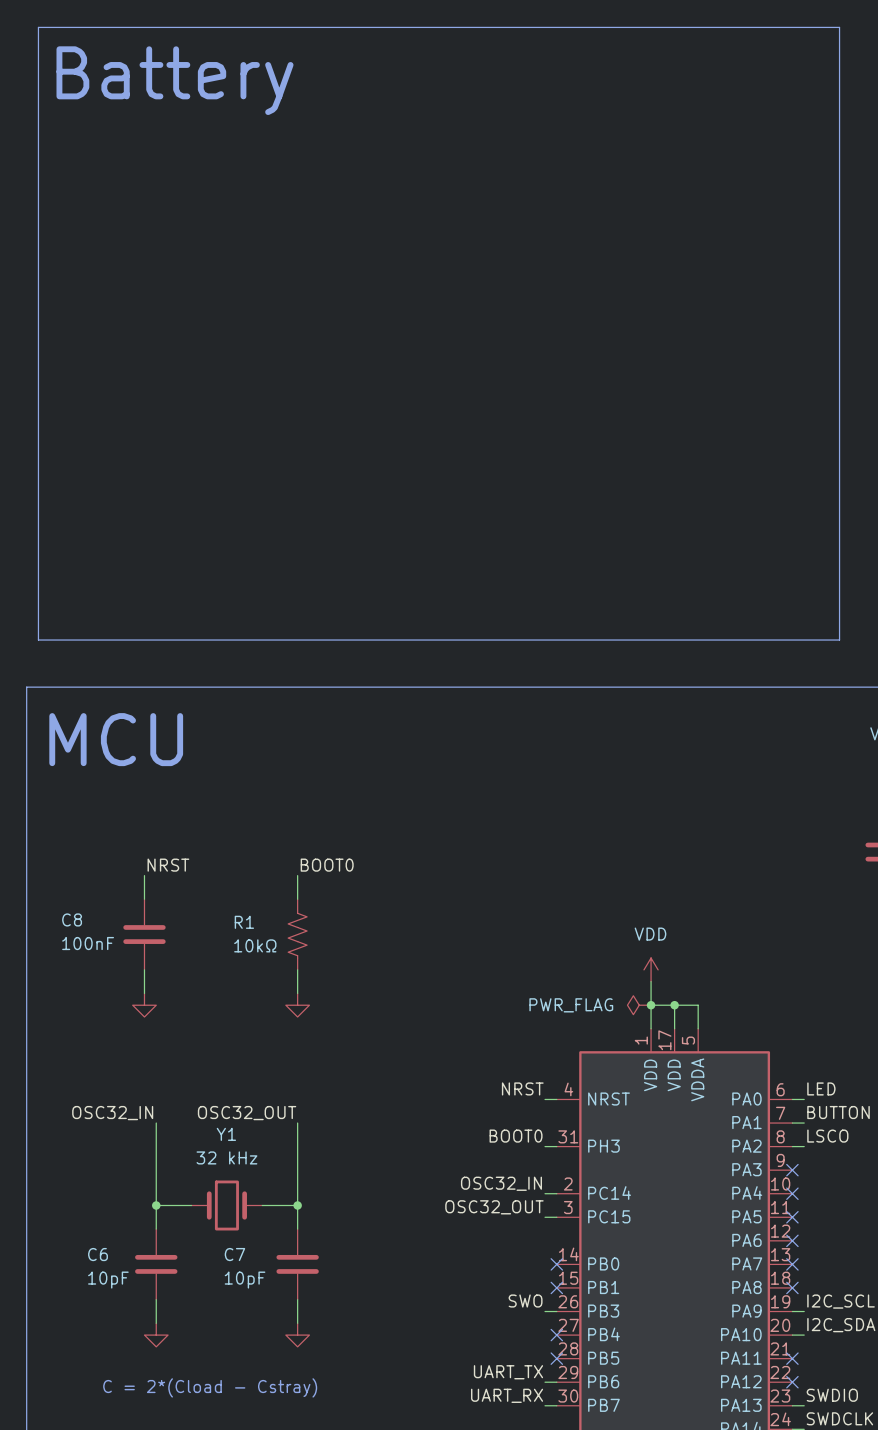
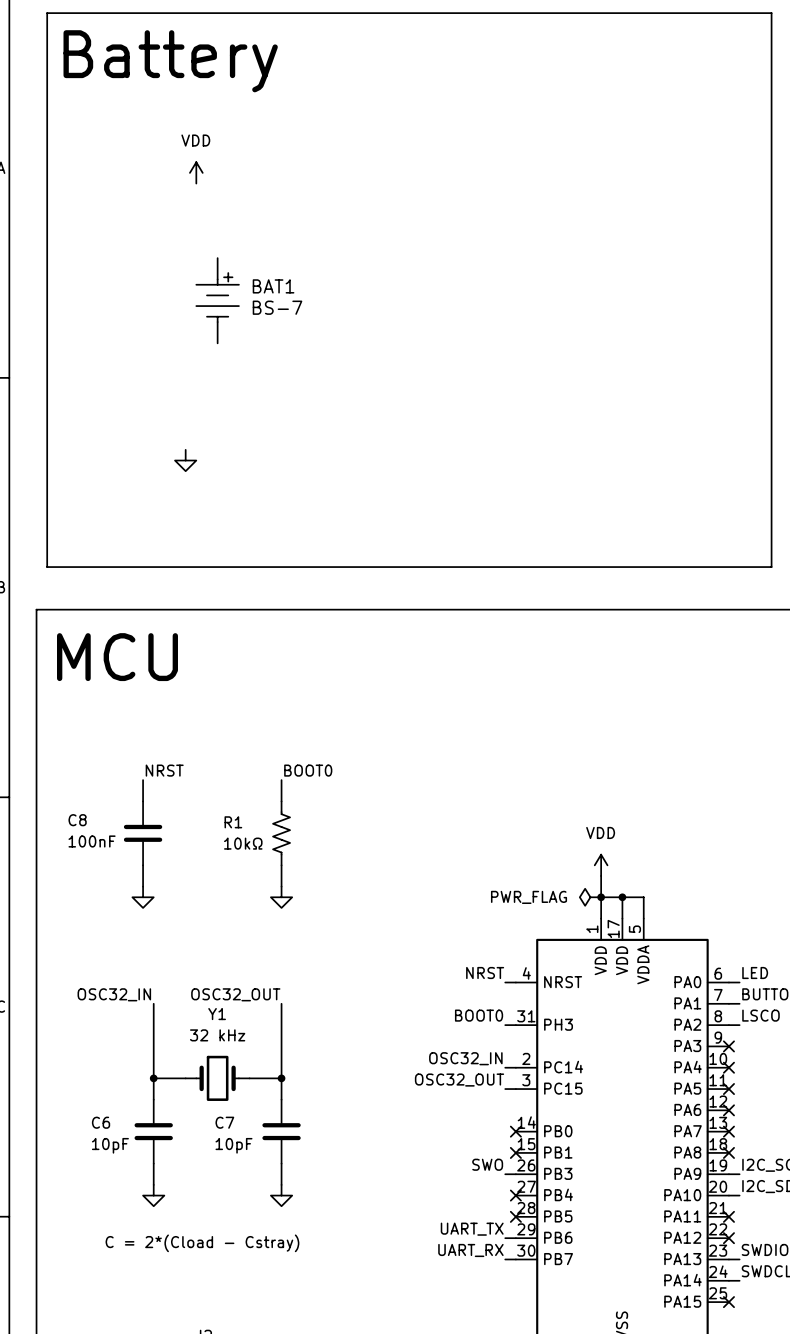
power symbol: none -> VDD (196, 172)
BAT1: none -> BS-7 (217, 300)
power symbol: none -> (185, 460)

